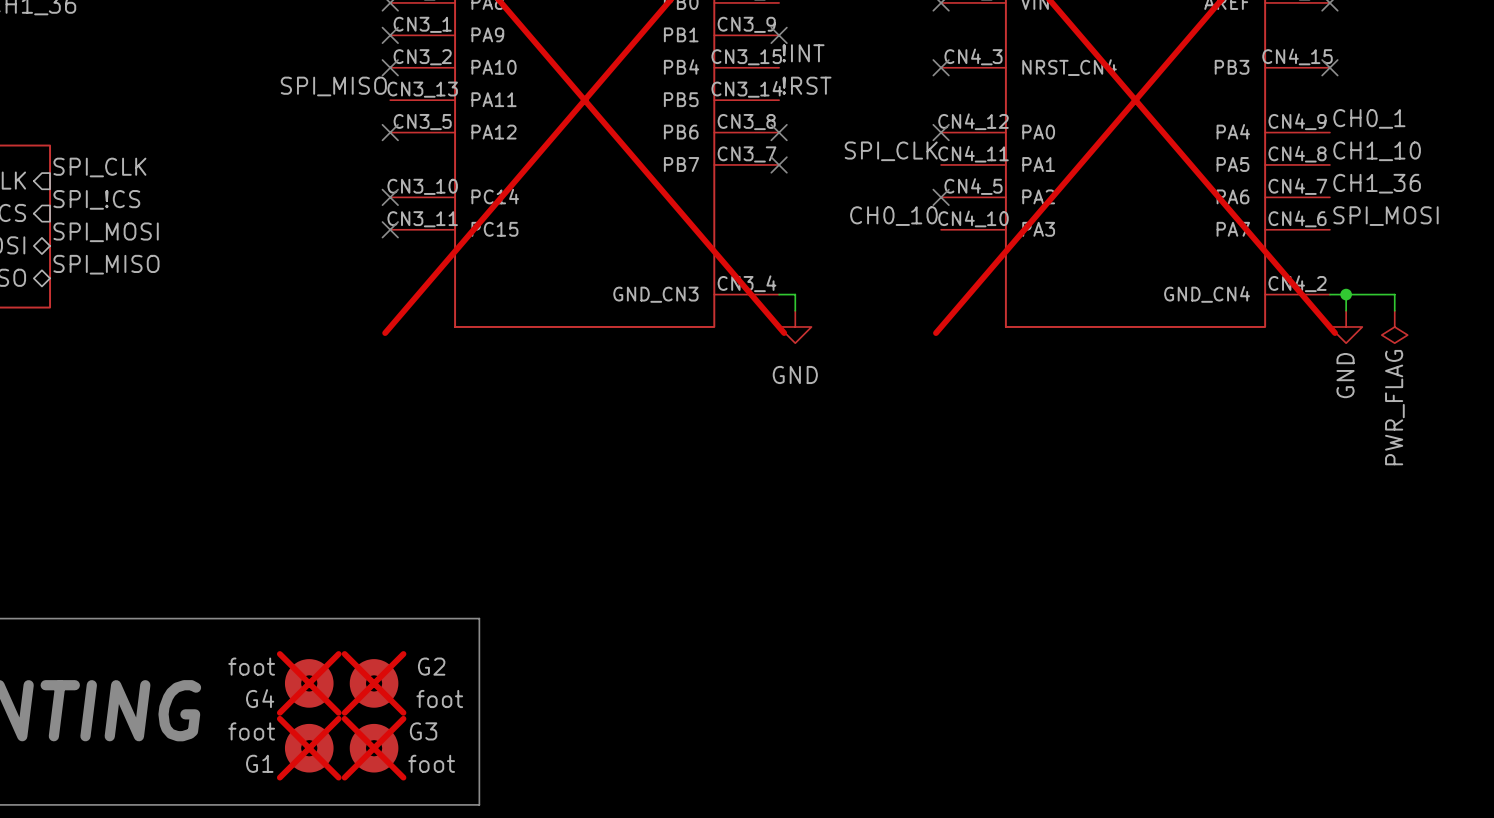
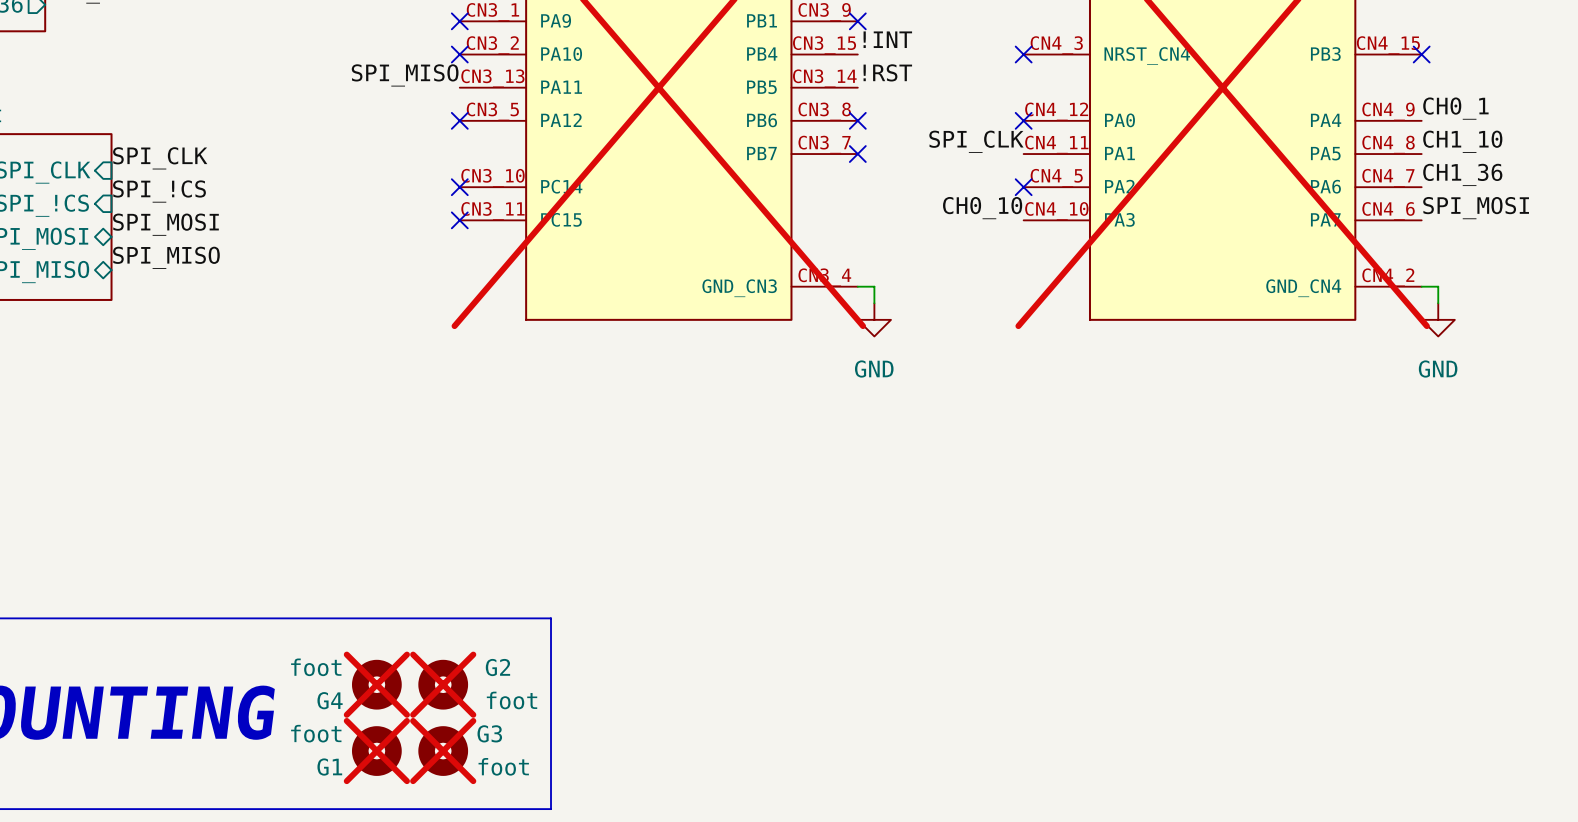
wire: (1346, 294) (1394, 294) (1394, 310) -> none
junction: (1346, 294) -> none
power symbol: PWR_FLAG (1394, 326) -> none
power symbol text rotation: 0° (1345, 375) -> 90° clockwise (1438, 369)

